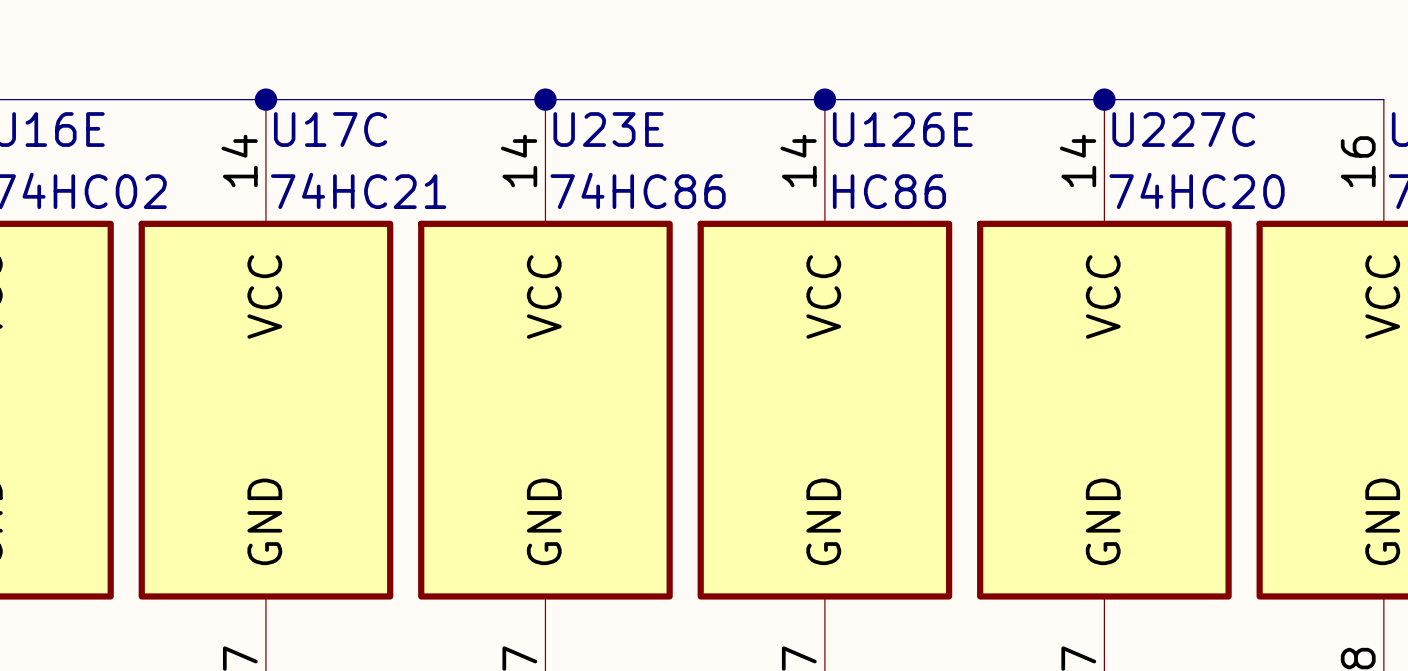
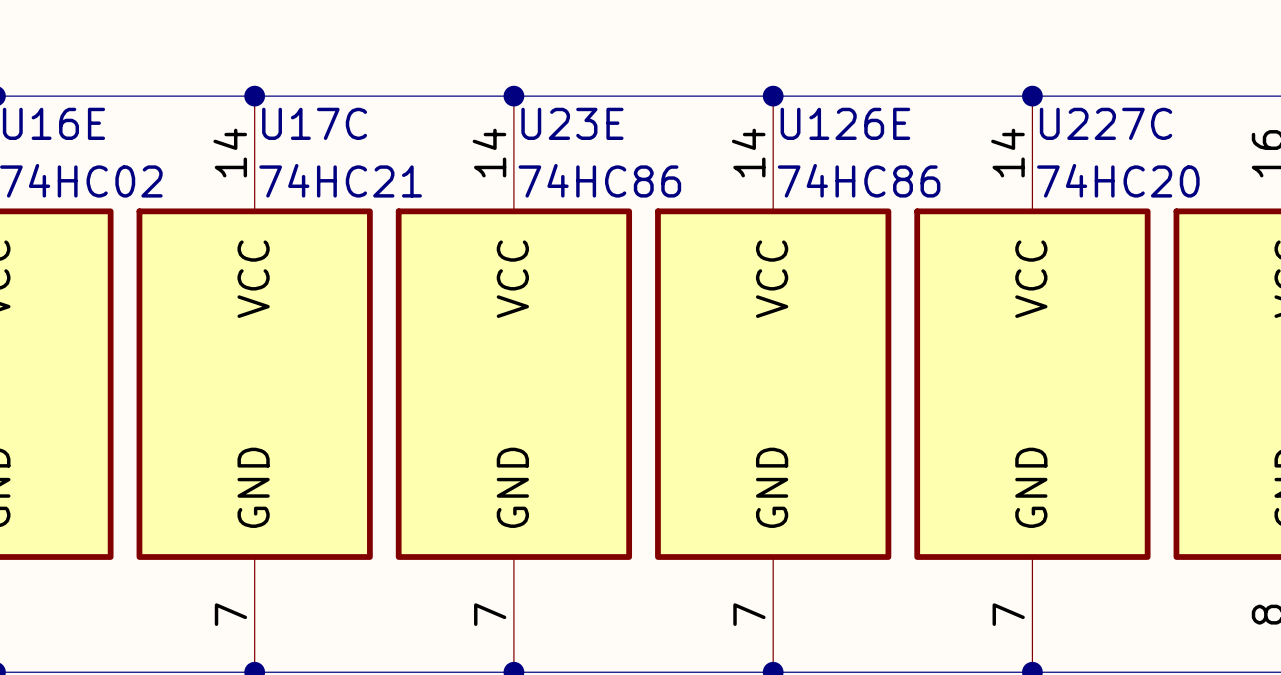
U126E value: HC86 (889, 191) -> 74HC86 (859, 180)

